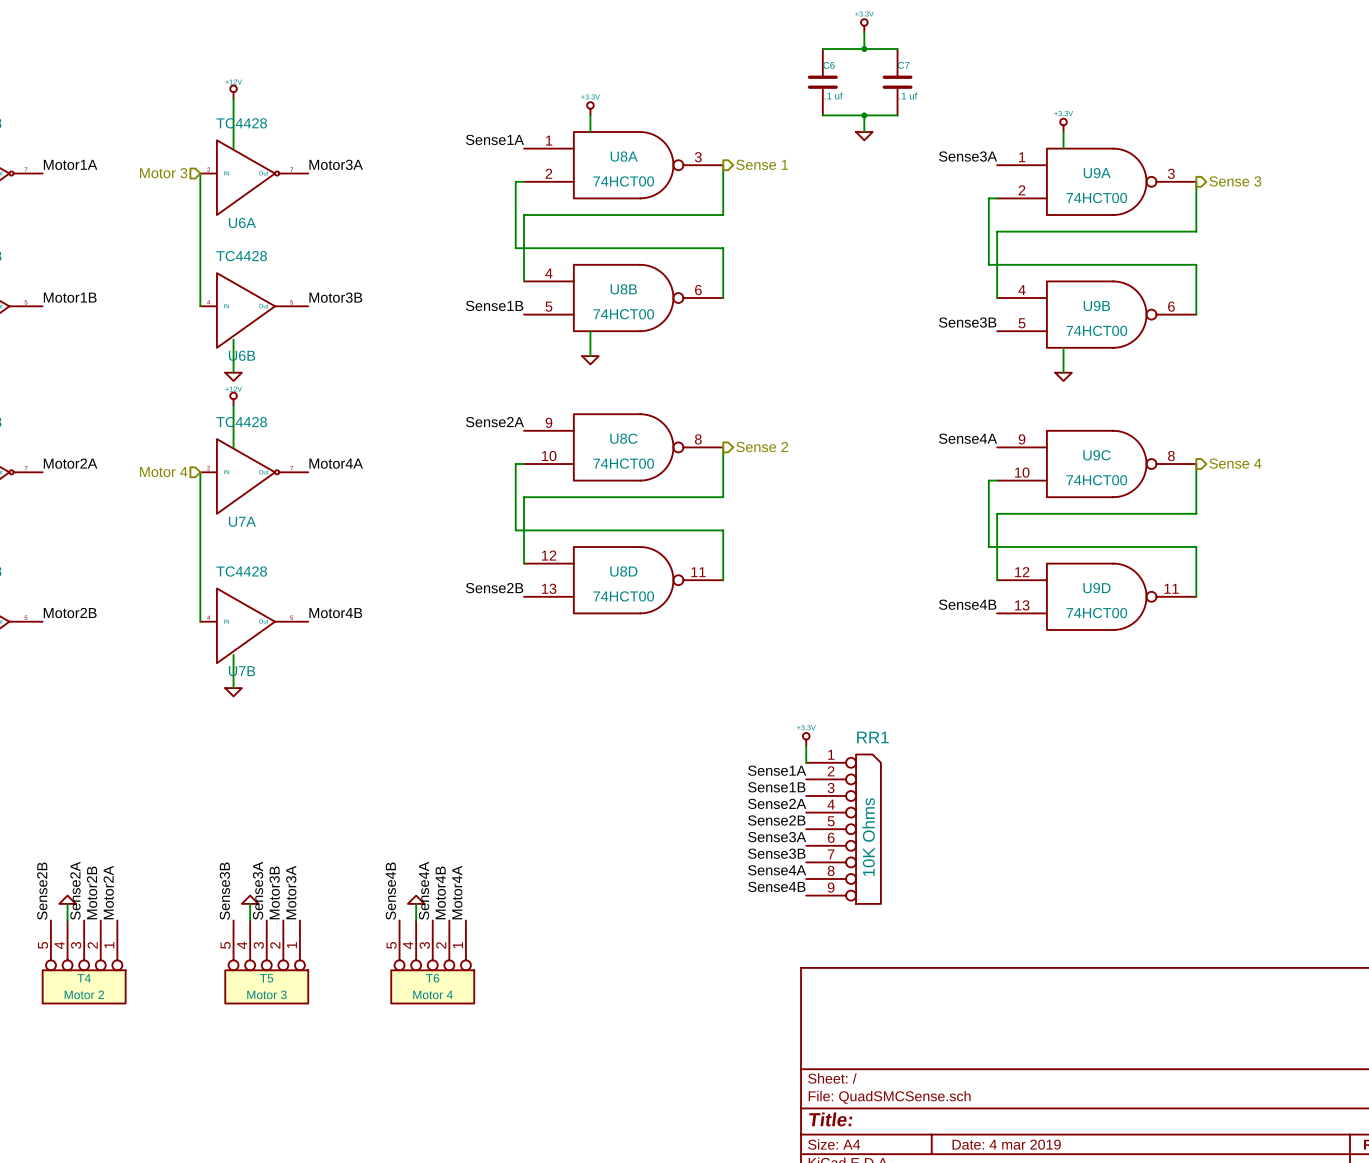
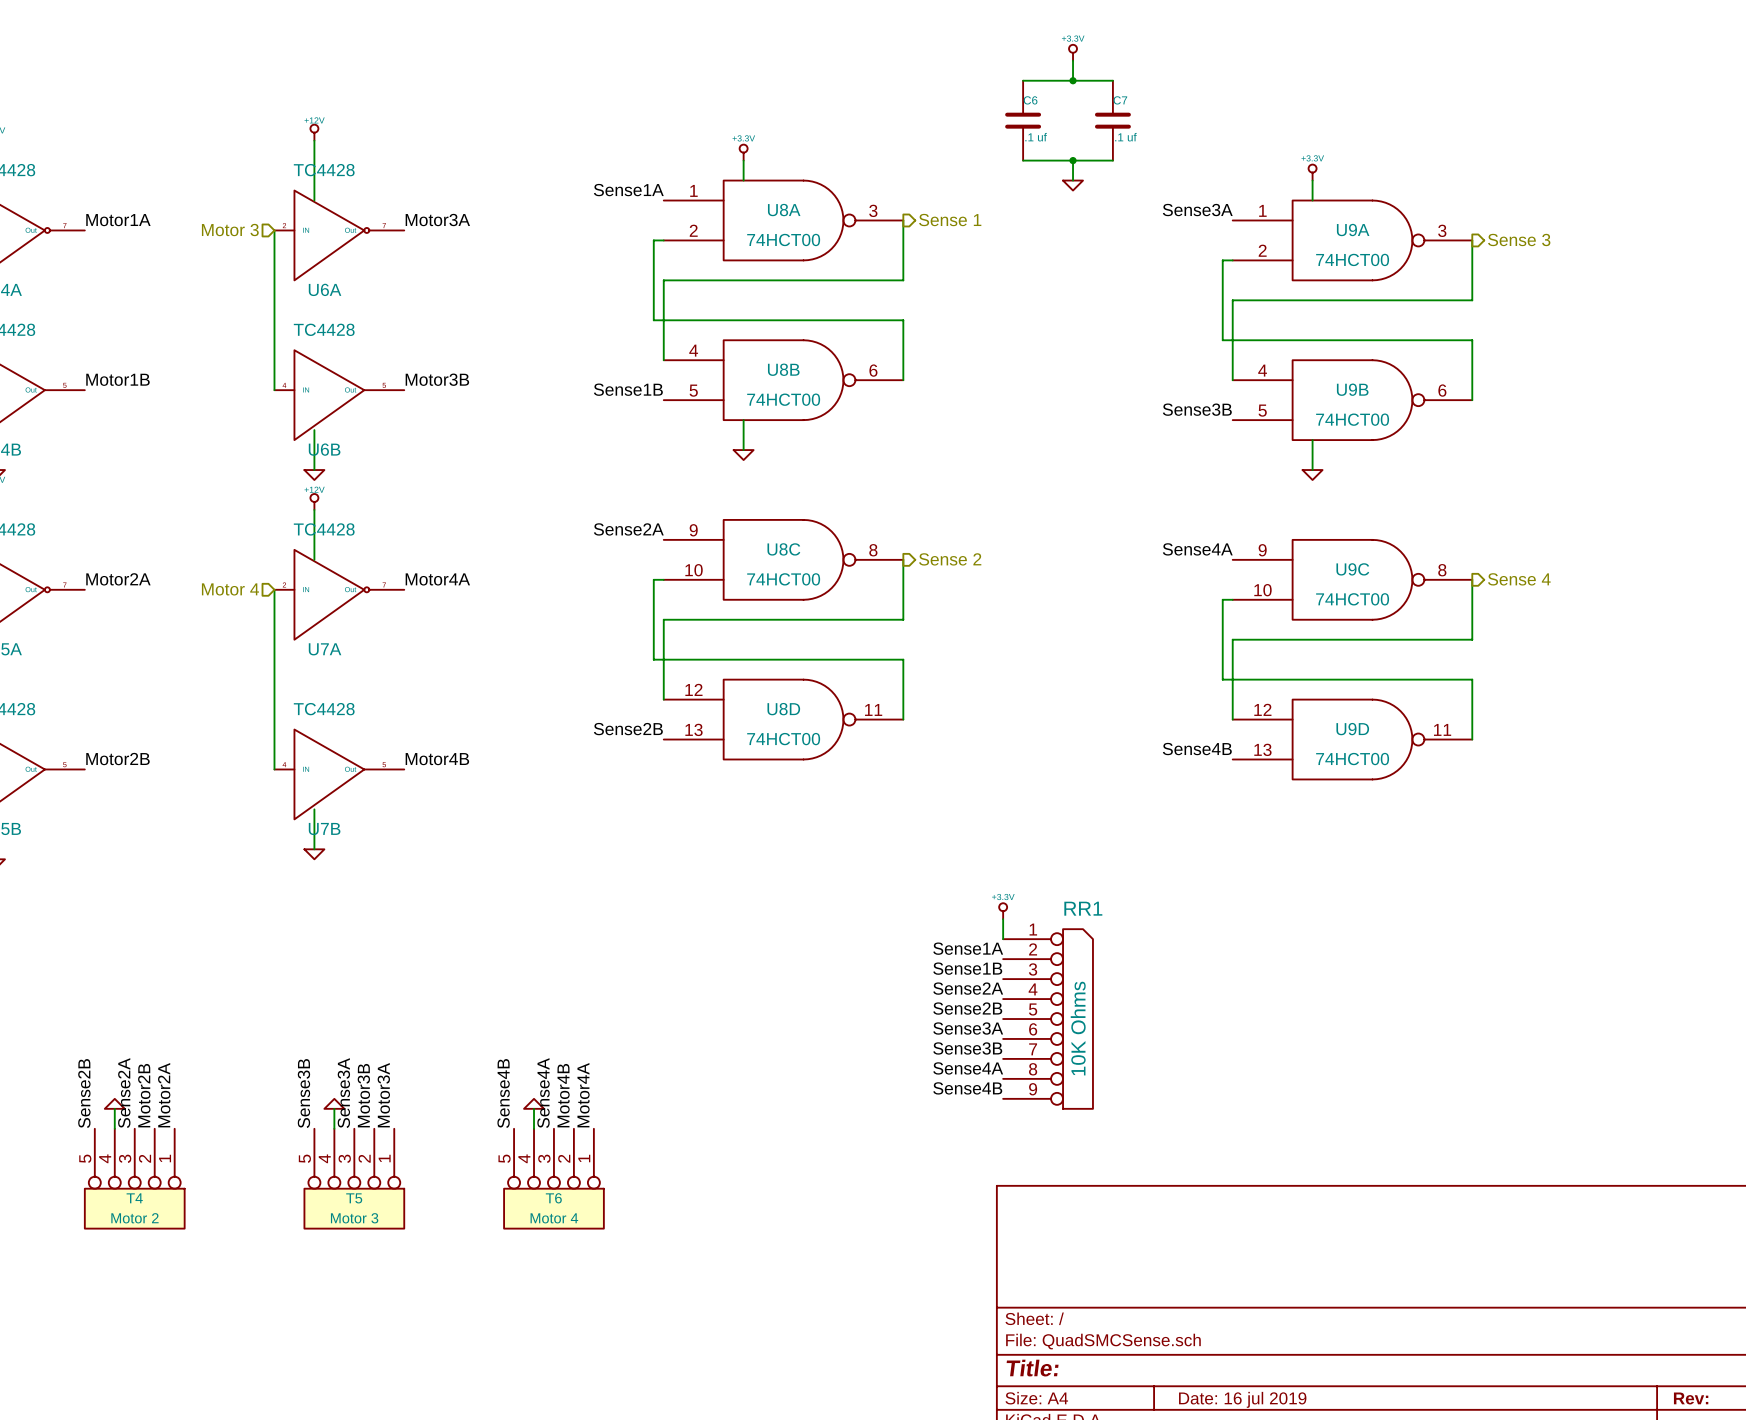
title block: Date: 4 mar 2019 (1006, 1144) -> Date: 16 jul 2019 (1242, 1399)

